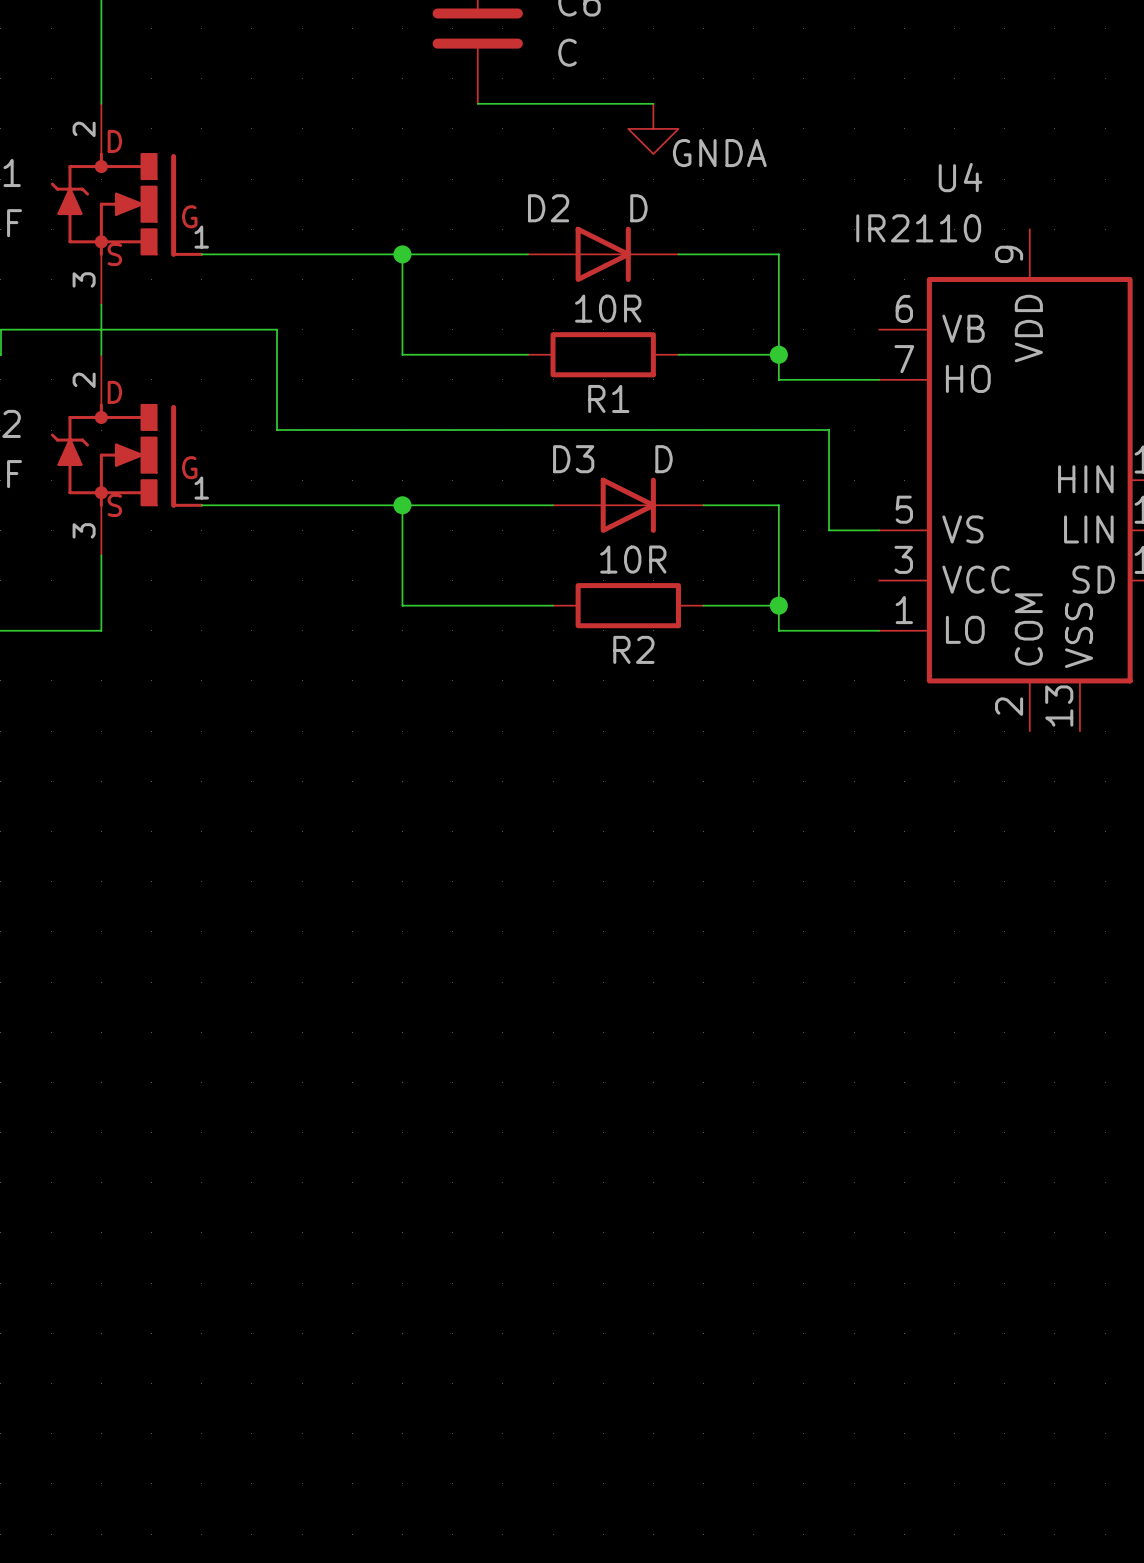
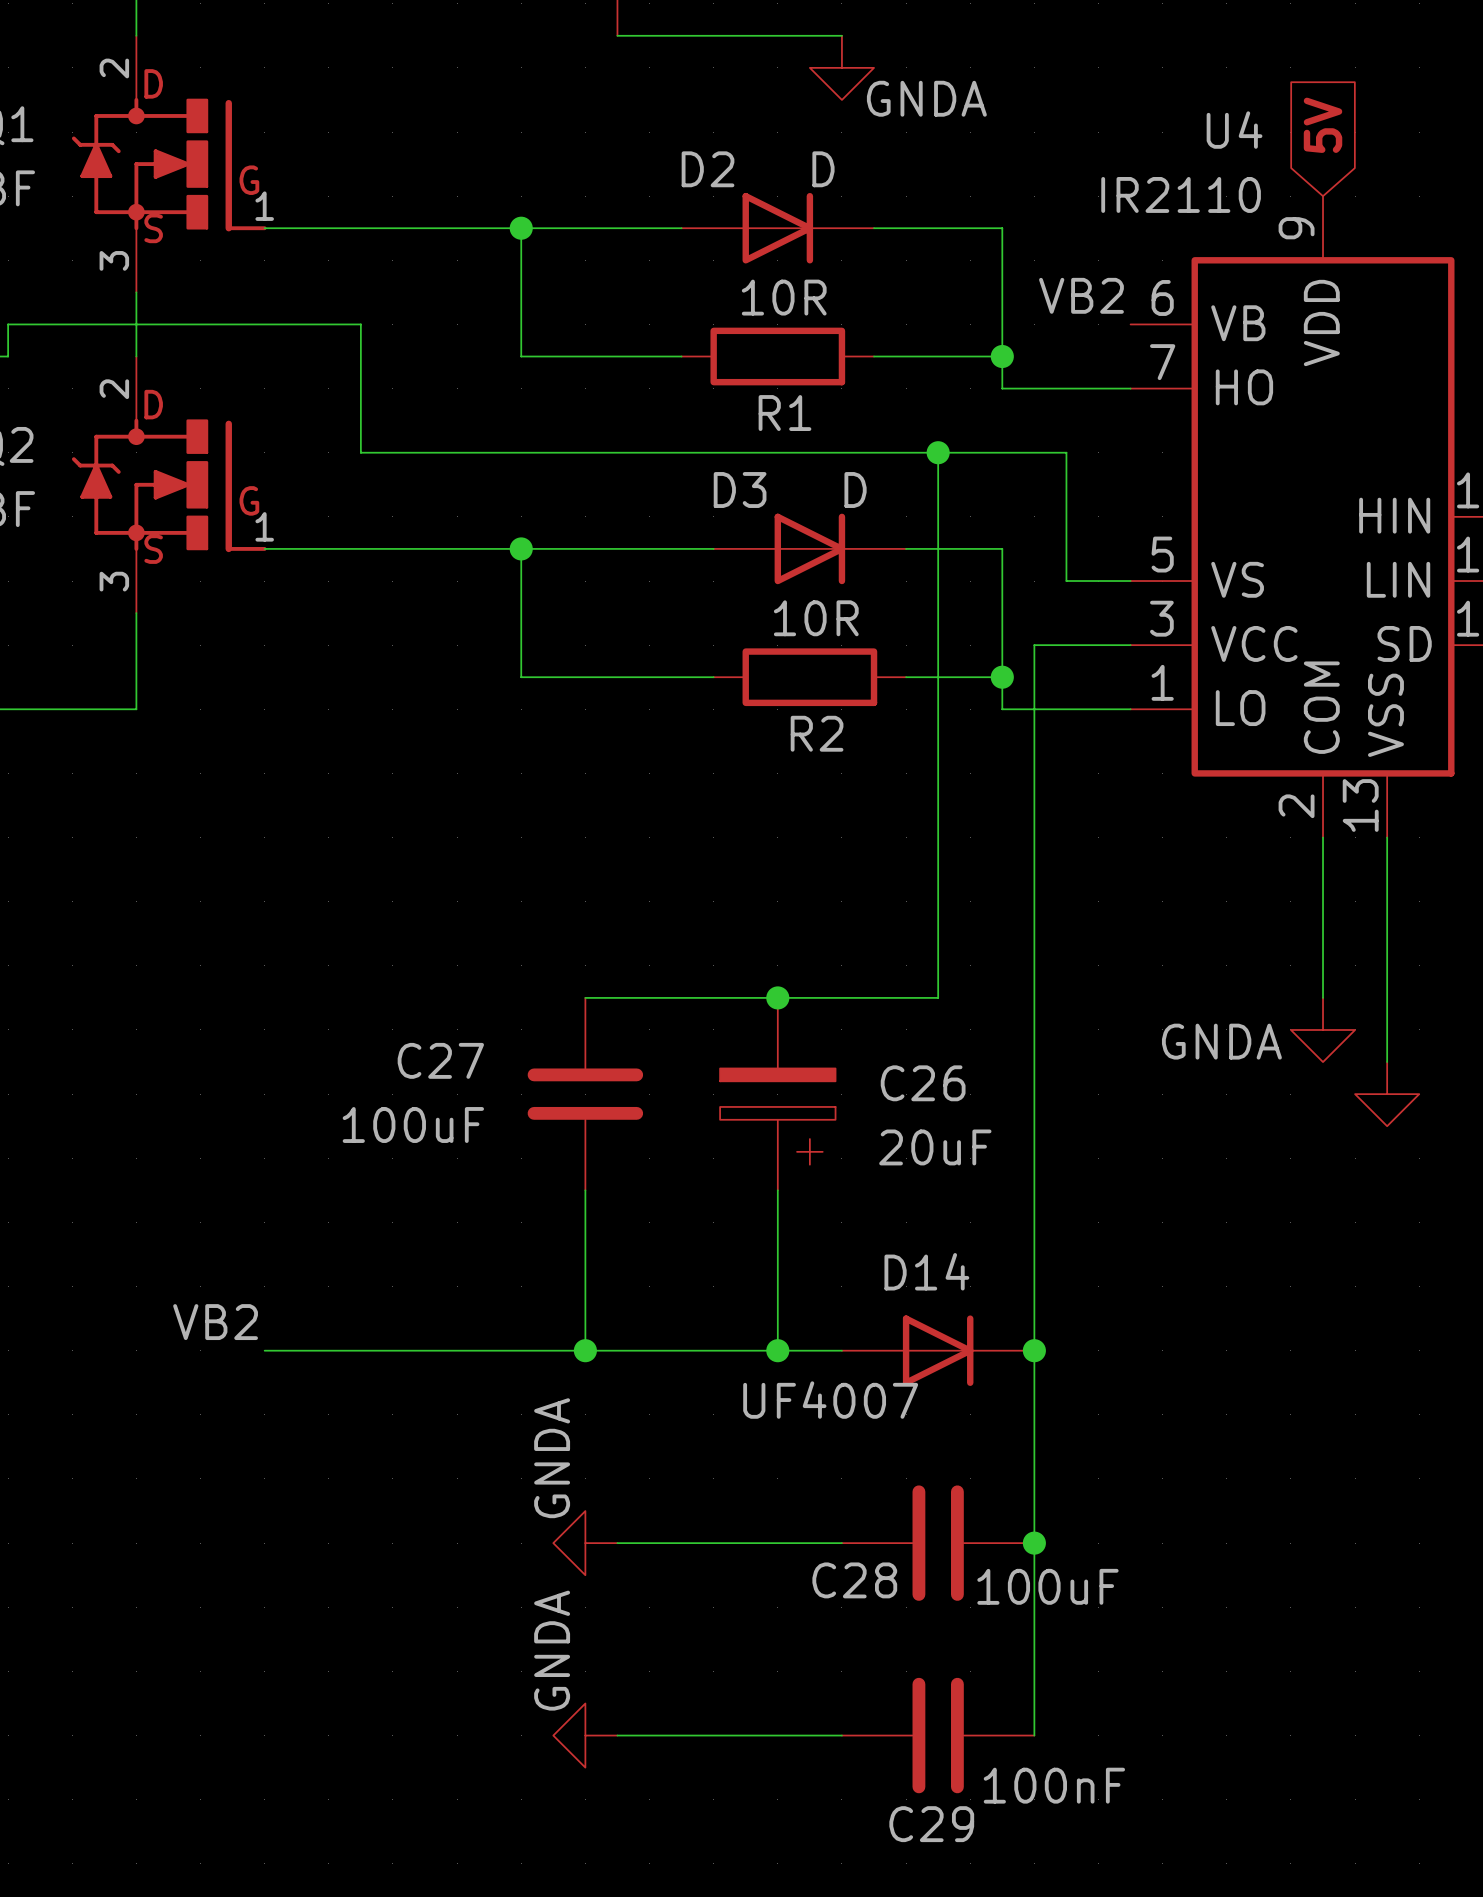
global label: none -> 5V (1323, 125)
label: none -> VB2 (1081, 295)
wire: none -> (938, 452) (938, 997) (585, 997)
junction: none -> (938, 452)
wire: none -> (1130, 645) (1034, 645) (1034, 1735)
wire: none -> (1323, 837) (1323, 997)
wire: none -> (1387, 837) (1387, 1062)
junction: none -> (777, 997)
power symbol: none -> GNDA (1323, 1029)
C27: none -> 100uF (585, 1094)
C26: none -> 20uF (777, 1094)
power symbol: none -> (1387, 1094)
wire: none -> (585, 1190) (585, 1350)
wire: none -> (777, 1190) (777, 1350)
label: none -> VB2 (215, 1322)
wire: none -> (264, 1350) (841, 1350)
junction: none -> (585, 1350)
junction: none -> (777, 1350)
D14: none -> UF4007 (938, 1350)
junction: none -> (1034, 1350)
power symbol: none -> GNDA (585, 1543)
wire: none -> (617, 1543) (841, 1543)
C28: none -> 100uF (938, 1543)
junction: none -> (1034, 1543)
power symbol: none -> GNDA (585, 1735)
wire: none -> (617, 1735) (841, 1735)
C29: none -> 100nF (938, 1735)

